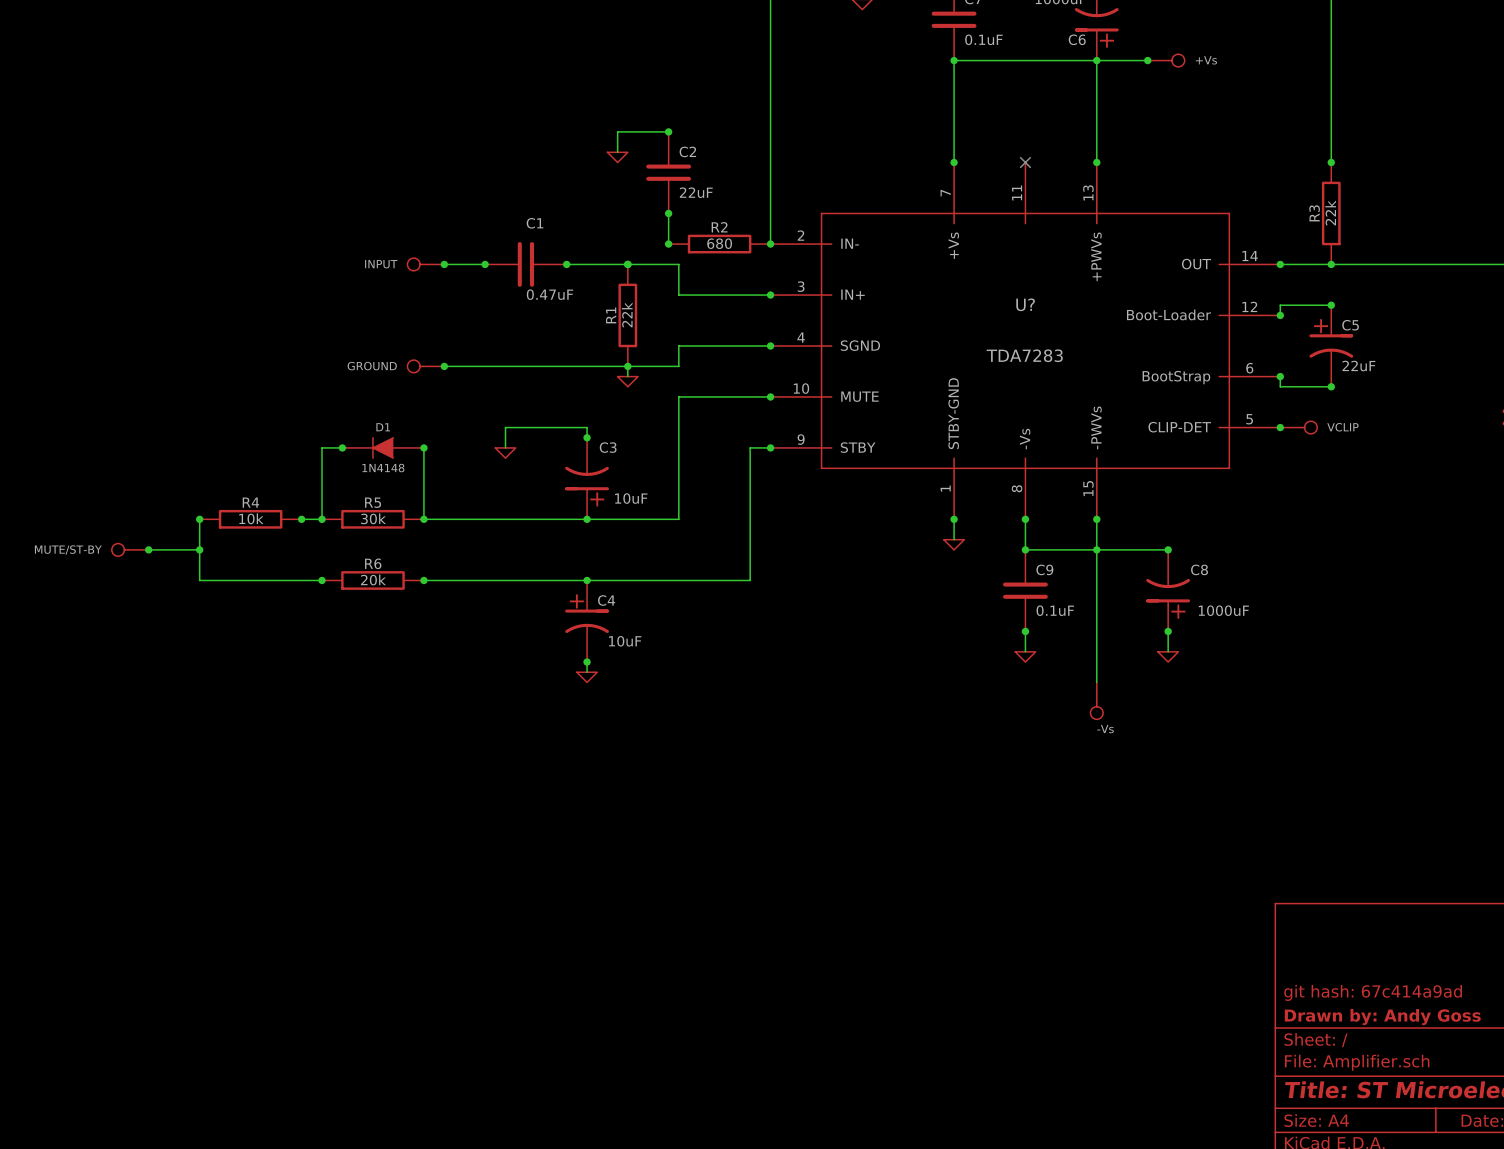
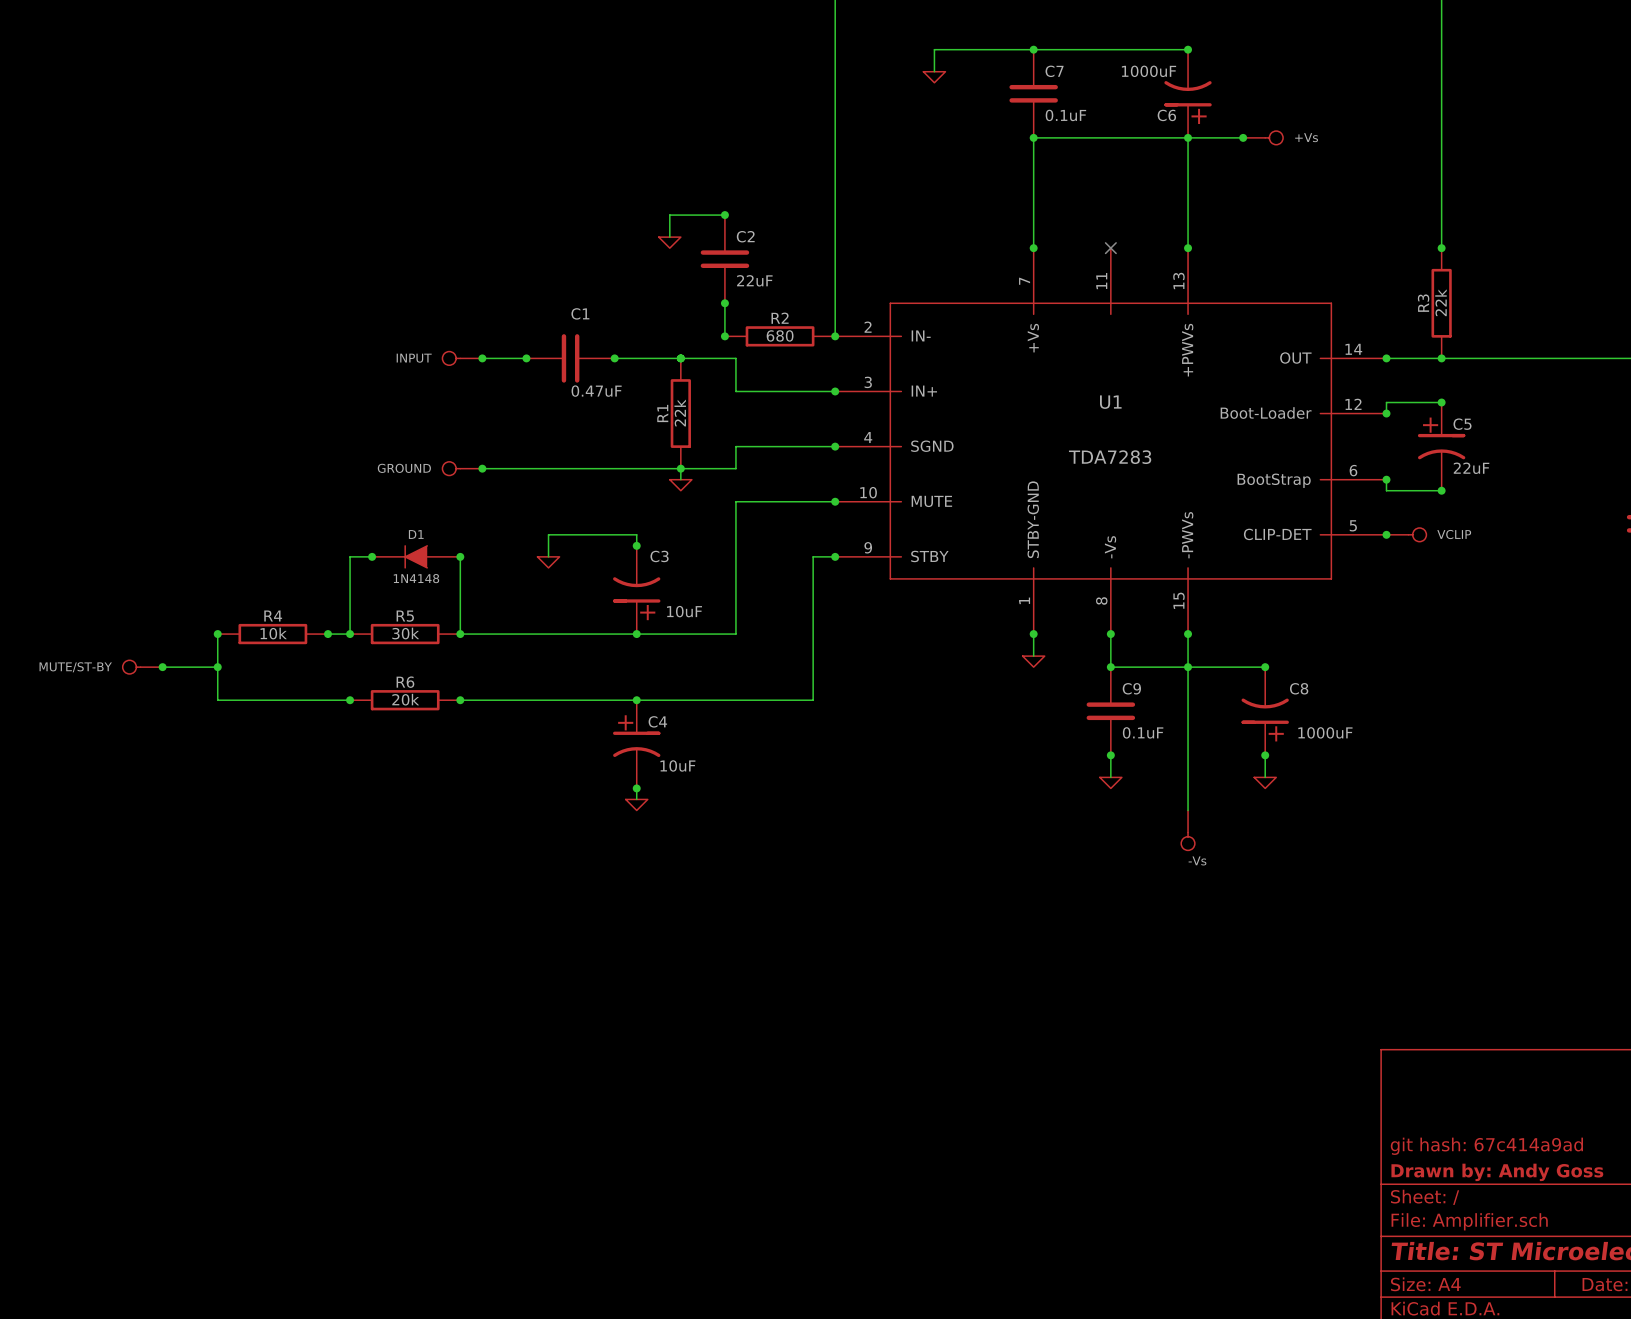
U? name: U? (1025, 304) -> U1 (1110, 402)

